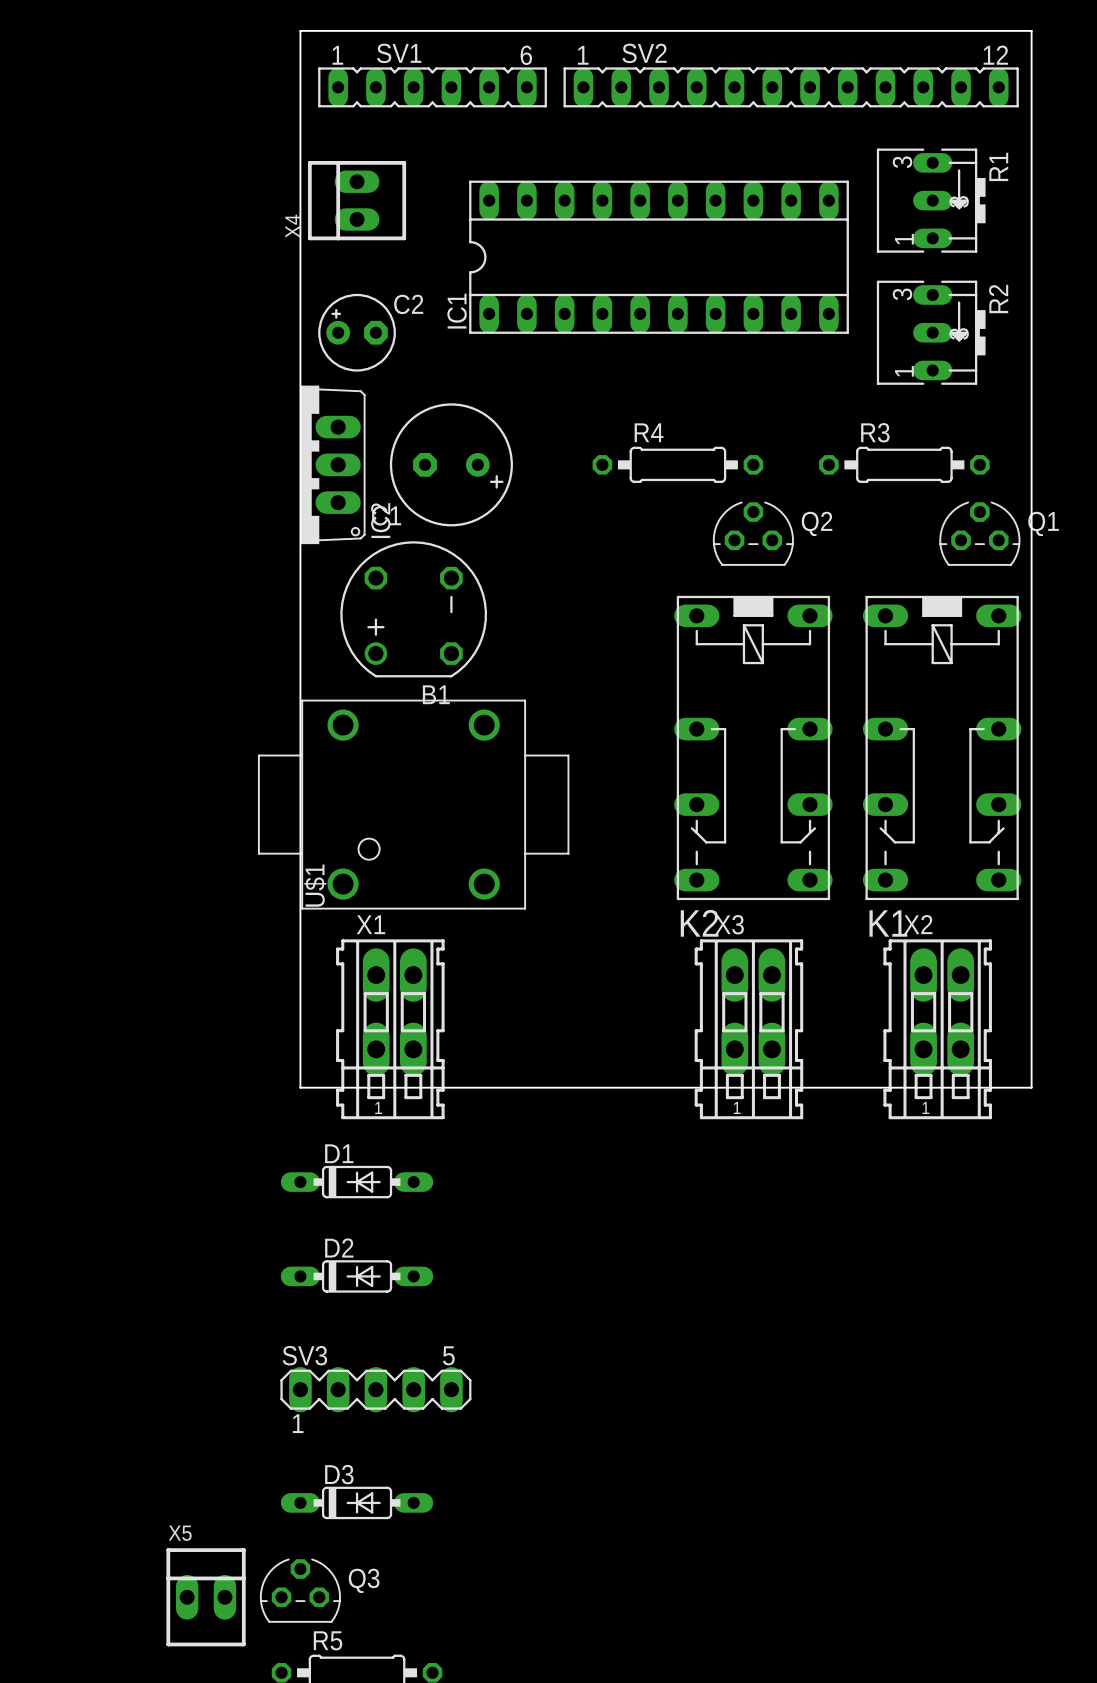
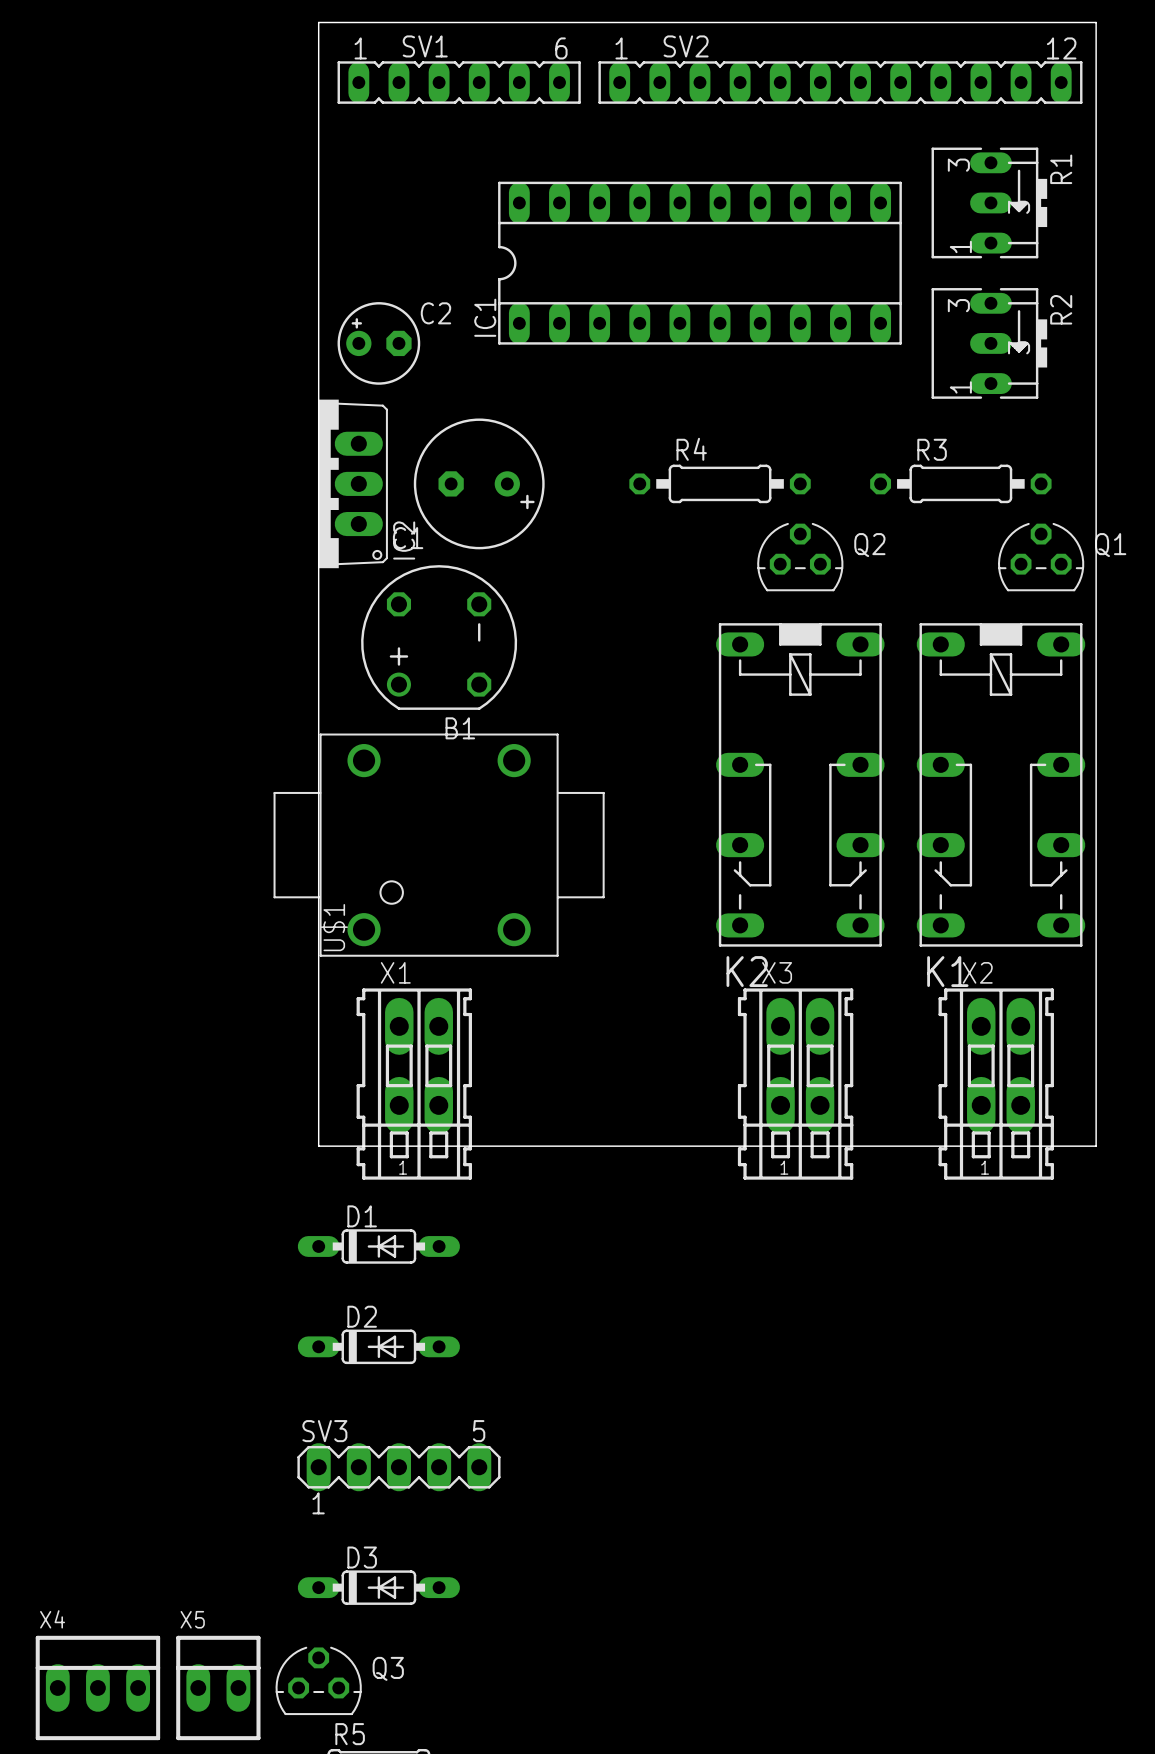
X4 footprint: [307, 160, 407, 241] -> [35, 1635, 161, 1741]
X4 name position: X4 (292, 226) -> X4 (52, 1619)

